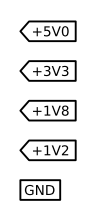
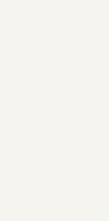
global label: +5V0 (50, 31) -> none
global label: +3V3 (50, 70) -> none
global label: +1V8 (50, 110) -> none
global label: +1V2 (50, 150) -> none
global label: GND (39, 190) -> none

